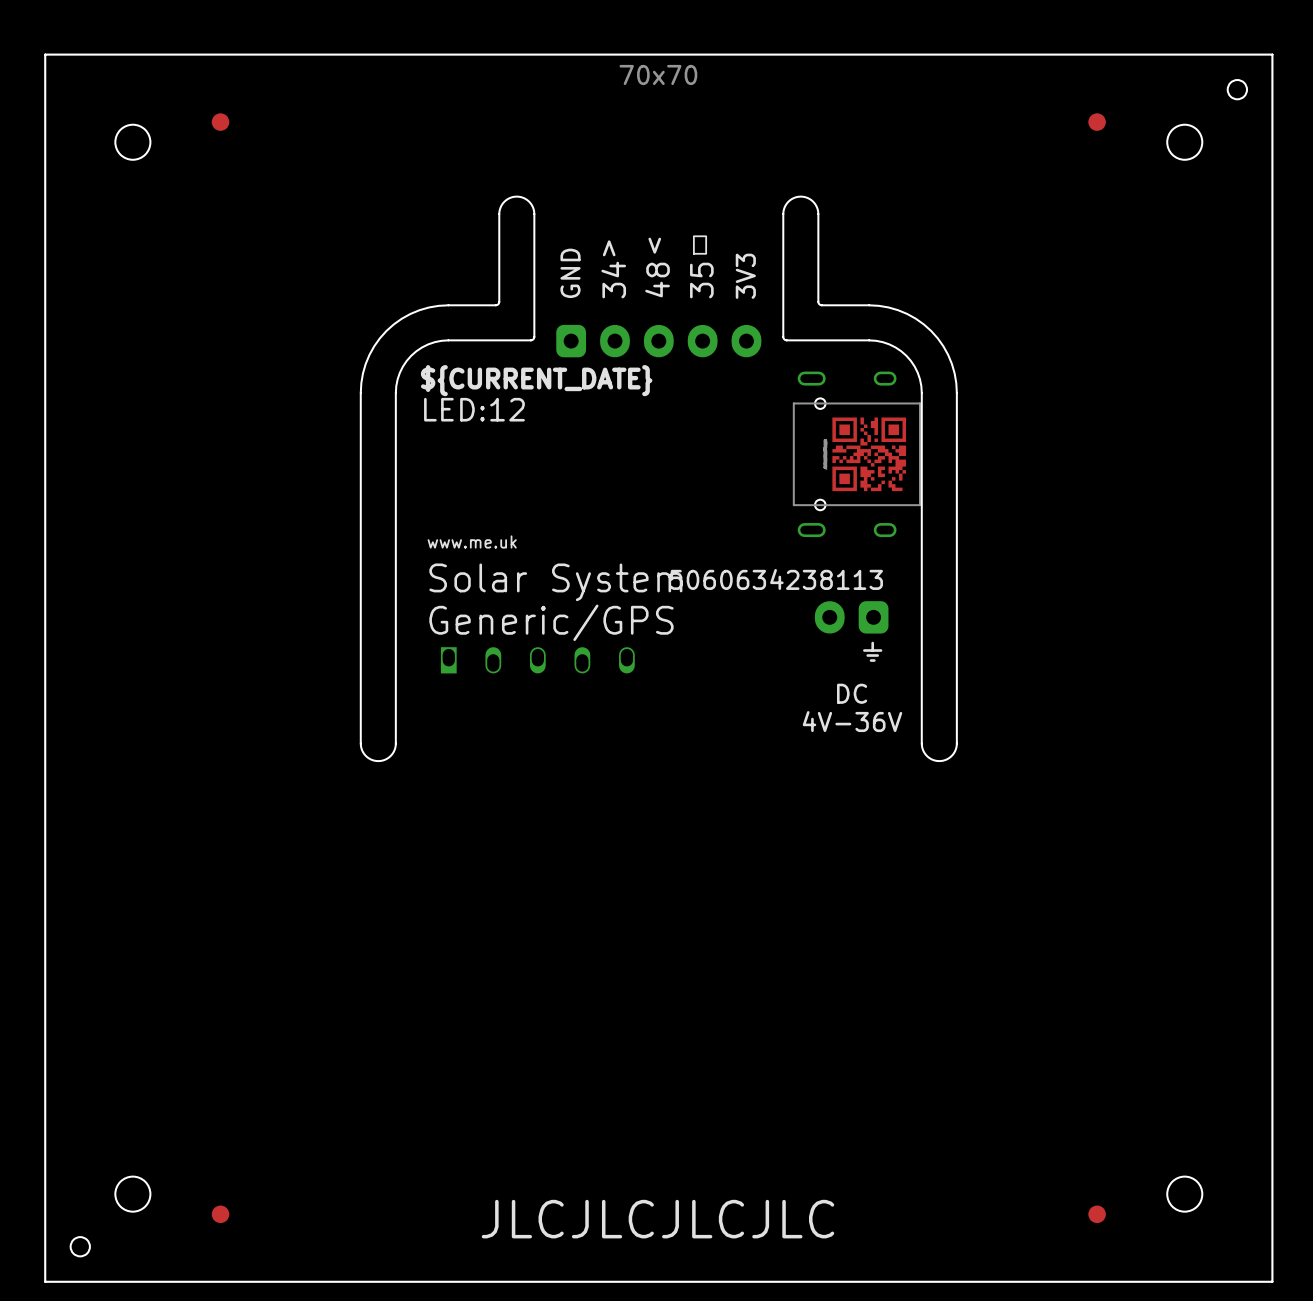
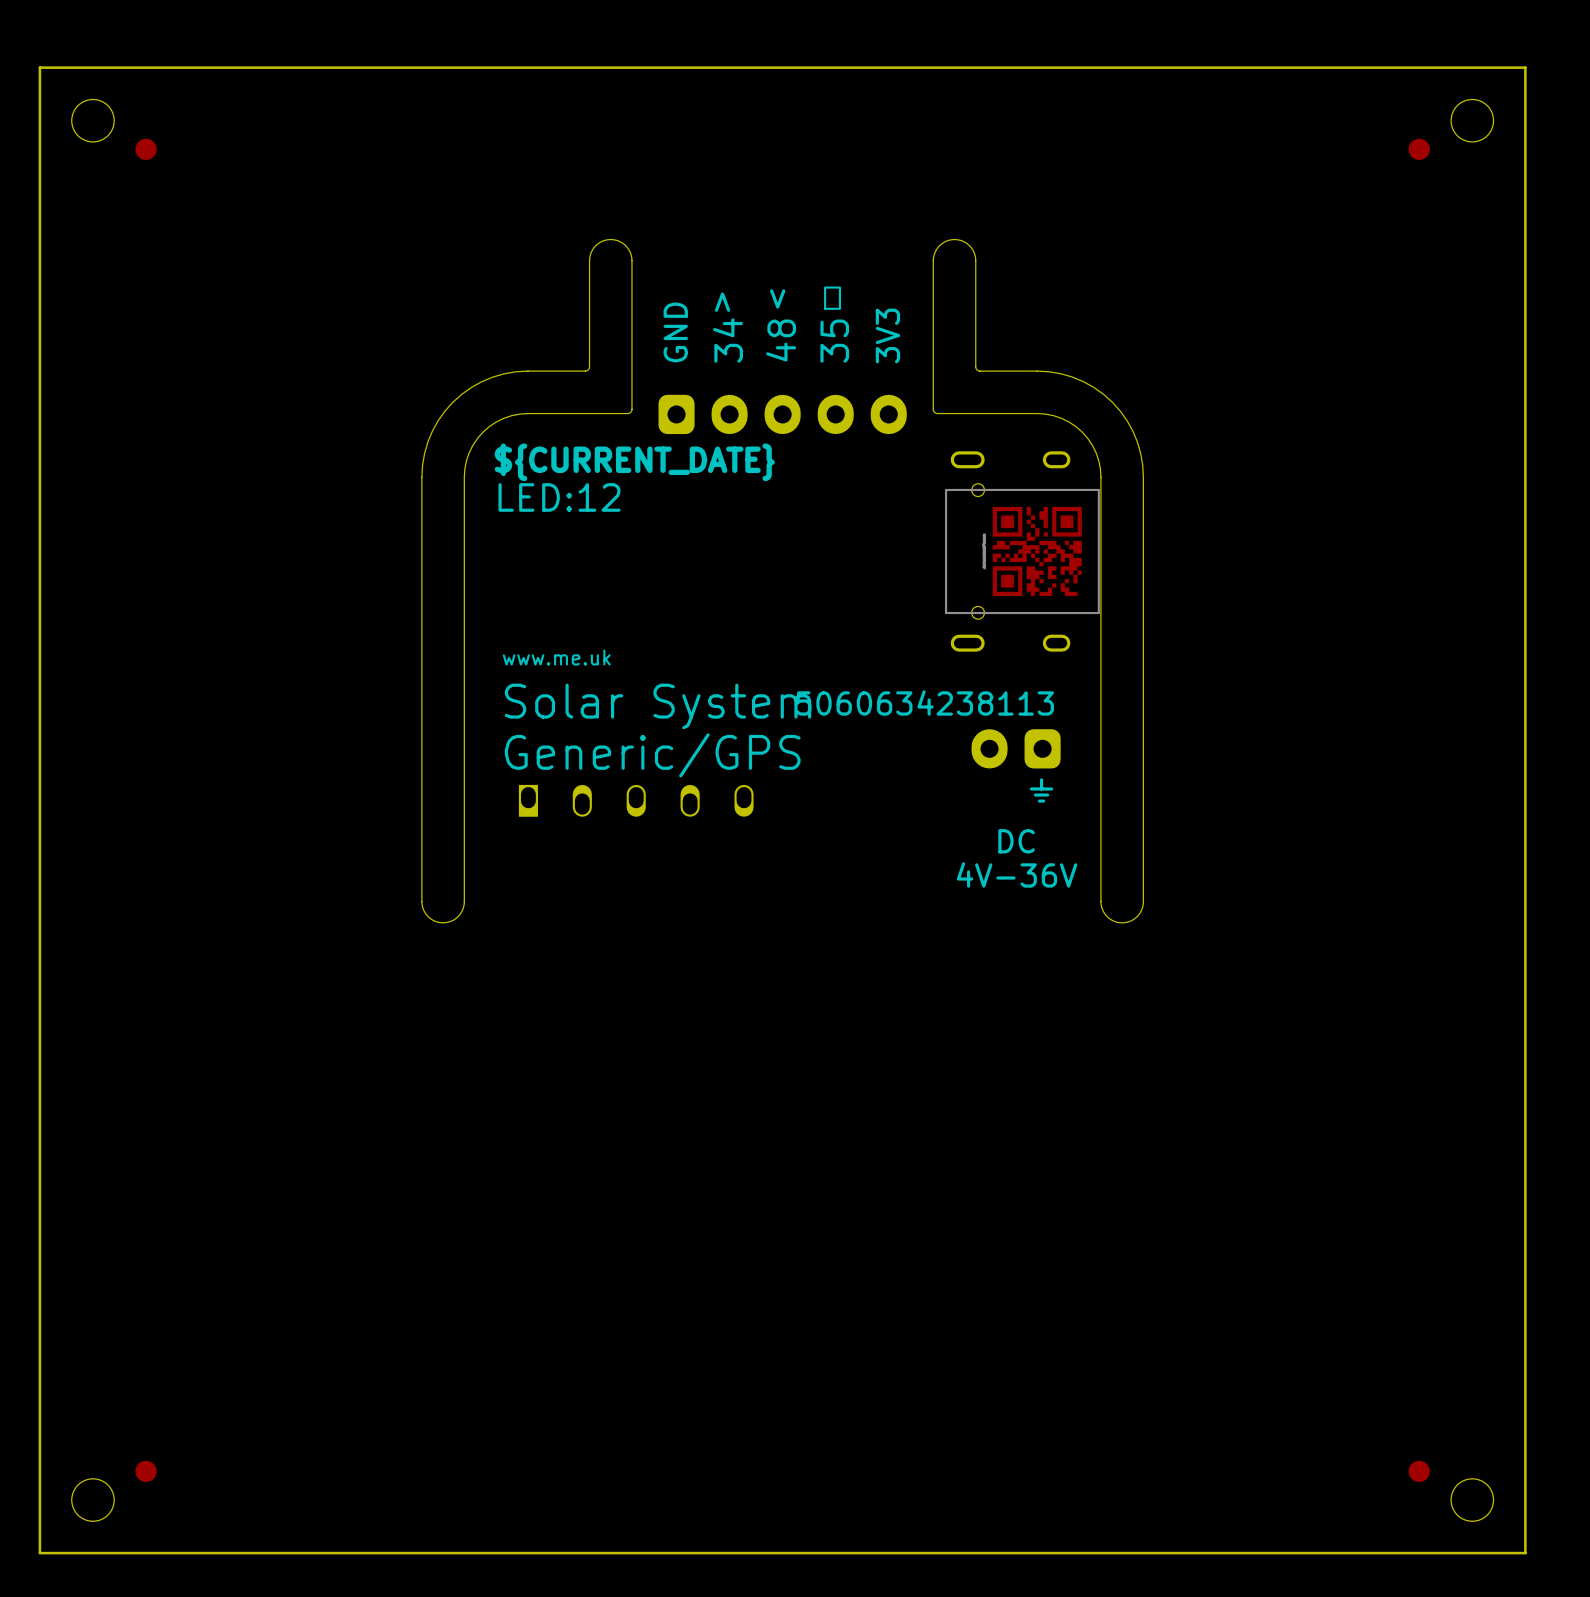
part footprint: [44, 53, 1274, 1283] -> [38, 66, 1527, 1555]
part value: 70x70 (658, 74) -> none

